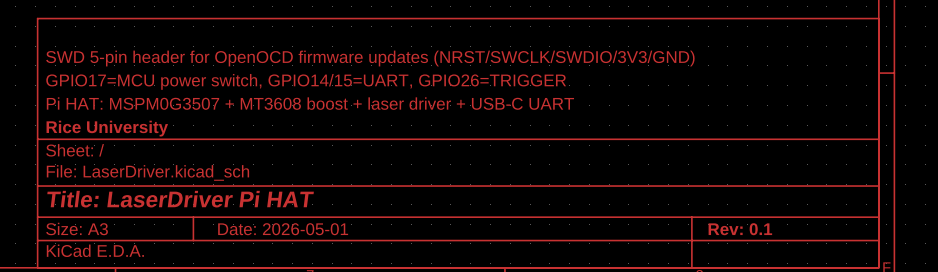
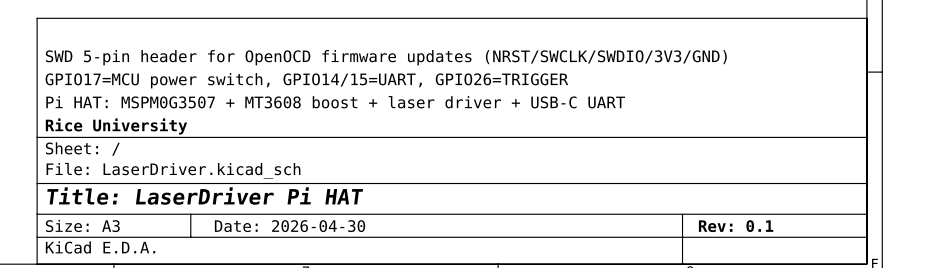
title block: Date: 2026-05-01 (283, 229) -> Date: 2026-04-30 (289, 226)

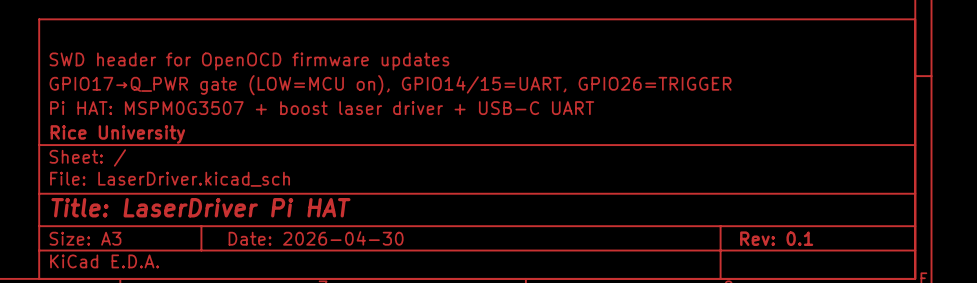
title block: SWD 5-pin header for OpenOCD firmware updates (NRST/SWCLK/SWDIO/3V3/GND) (386, 57) -> SWD header for OpenOCD firmware updates (249, 61)
title block: GPIO17=MCU power switch, GPIO14/15=UART, GPIO26=TRIGGER (306, 80) -> GPIO17→Q_PWR gate (LOW=MCU on), GPIO14/15=UART, GPIO26=TRIGGER (390, 85)
title block: Pi HAT: MSPM0G3507 + MT3608 boost + laser driver + USB-C UART (335, 102) -> Pi HAT: MSPM0G3507 + boost laser driver + USB-C UART (322, 108)

